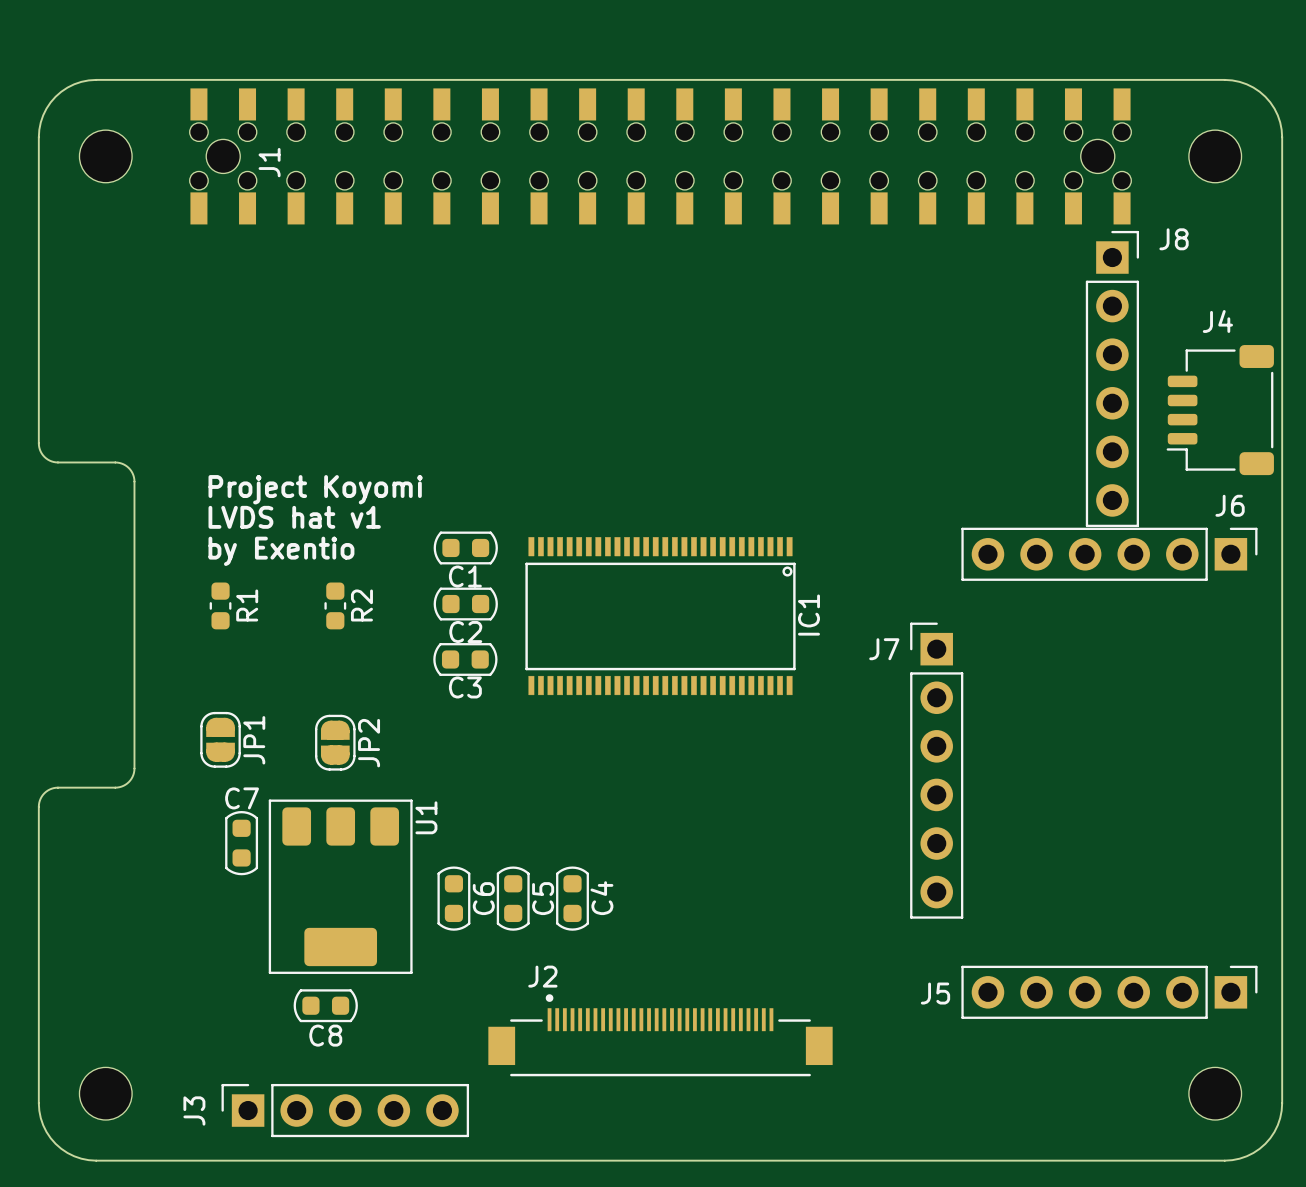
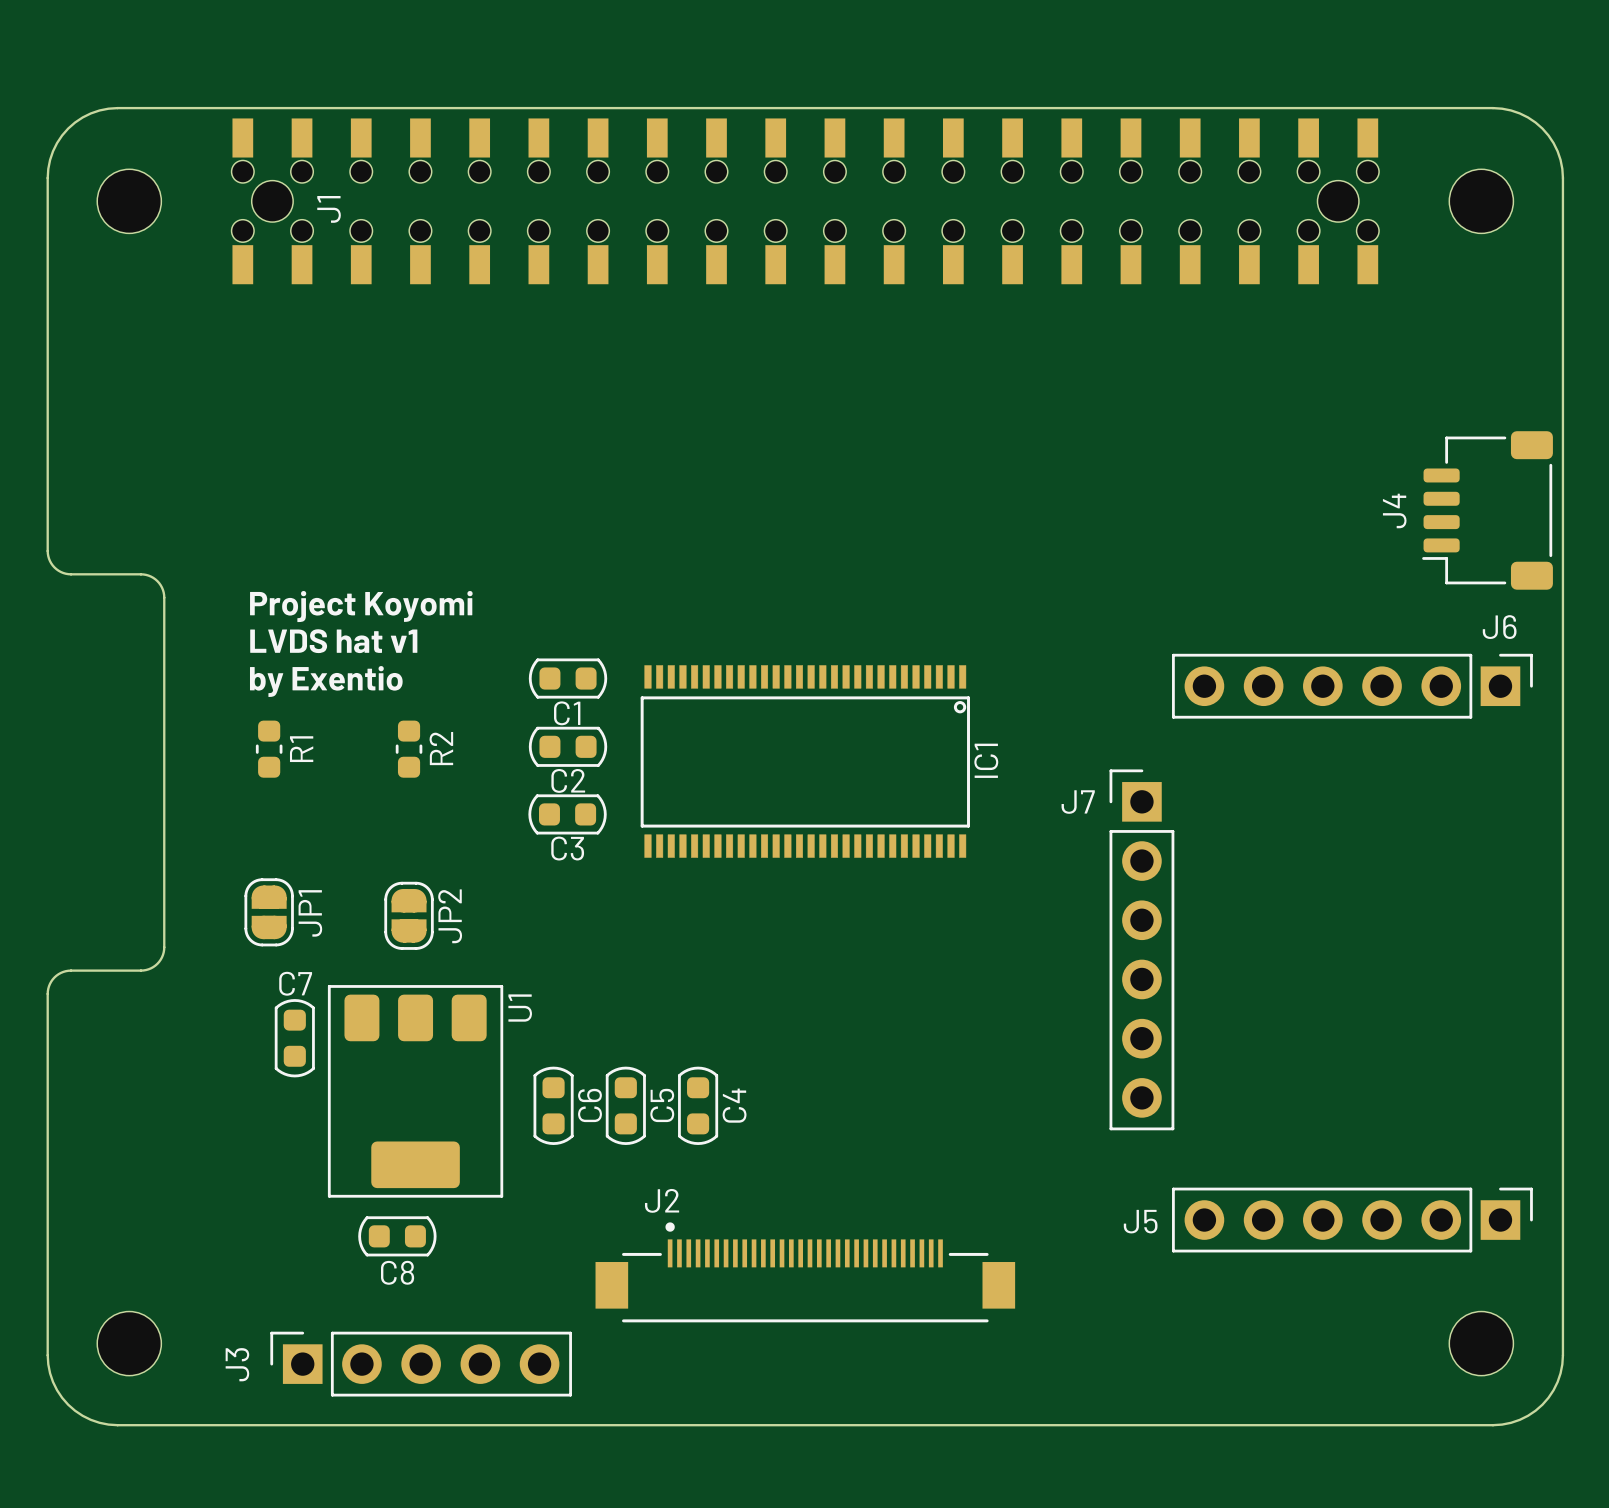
J4 name rotation: 0° (1217, 321) -> 90° counterclockwise (1394, 510)
J4 name position: J4 (1217, 321) -> J4 (1394, 510)
J8: (1112, 378) -> none

